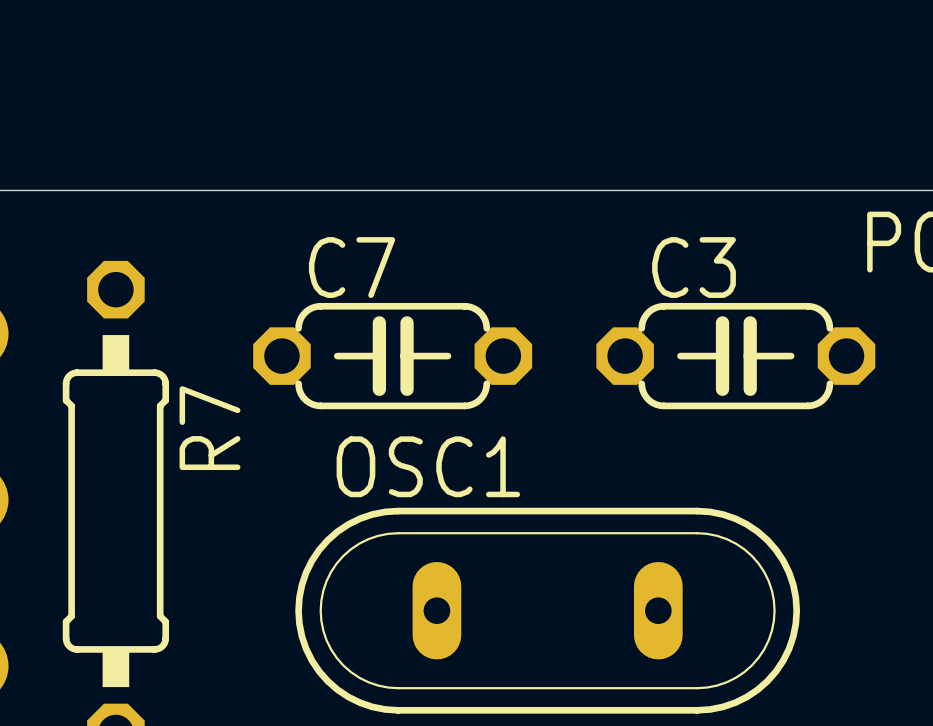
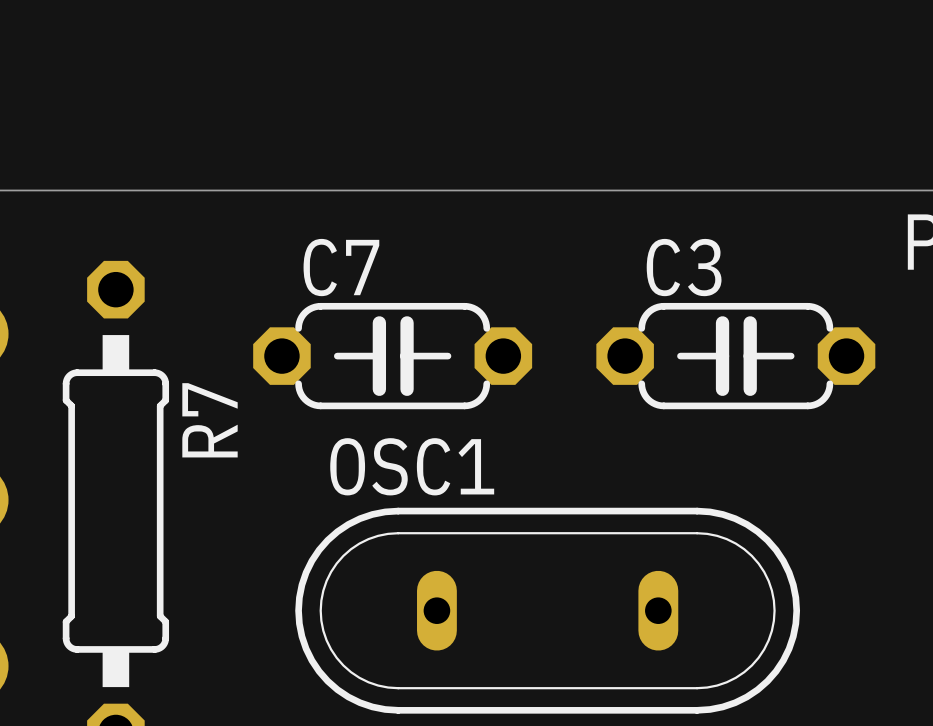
OSC1 footprint: [295, 507, 801, 714] -> [295, 507, 801, 714]

